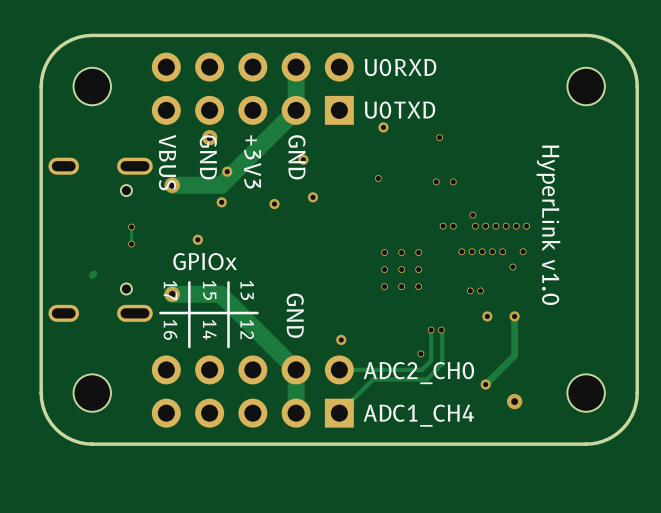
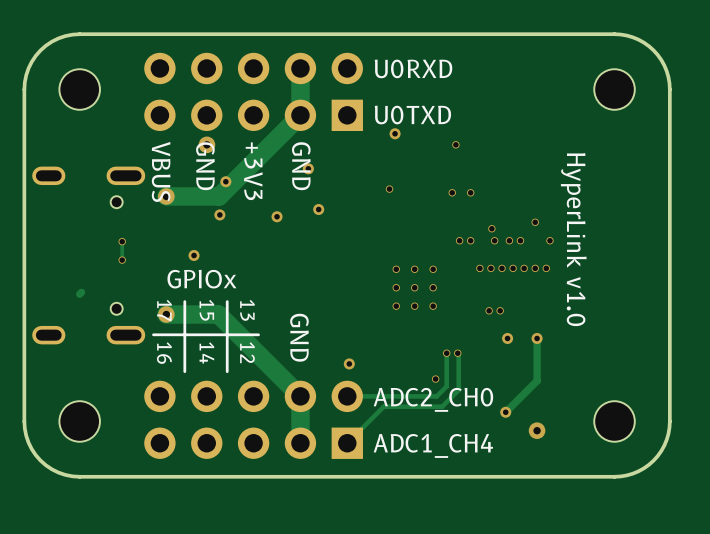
via: none -> (535, 222)
via: (485, 226) -> none
via: none -> (509, 240)
via: (495, 226) -> none
via: none -> (520, 240)
via: (506, 226) -> none
via: (516, 226) -> none
via: none -> (535, 268)
via: (512, 267) -> none

